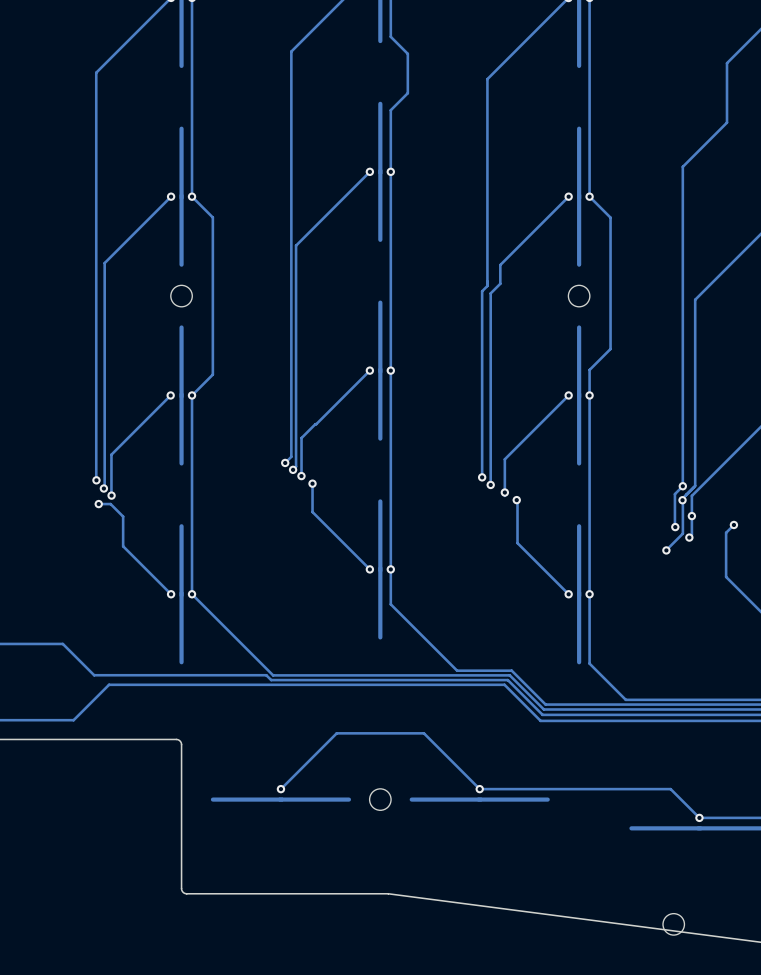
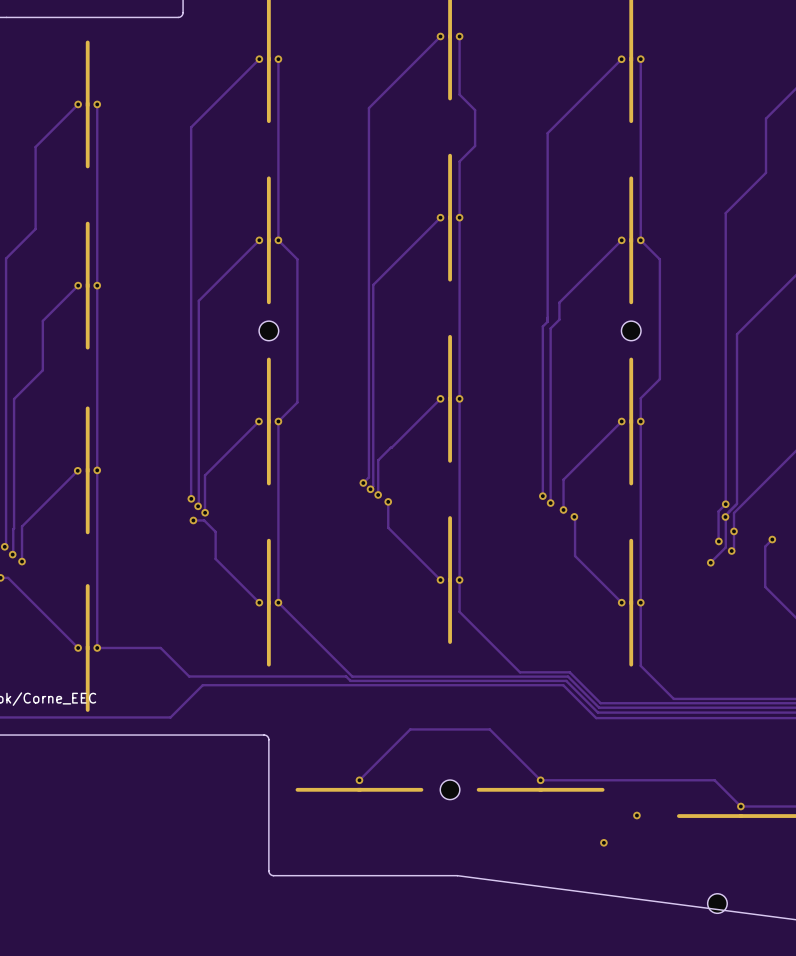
via: none -> (636, 815)
via: none -> (603, 842)

